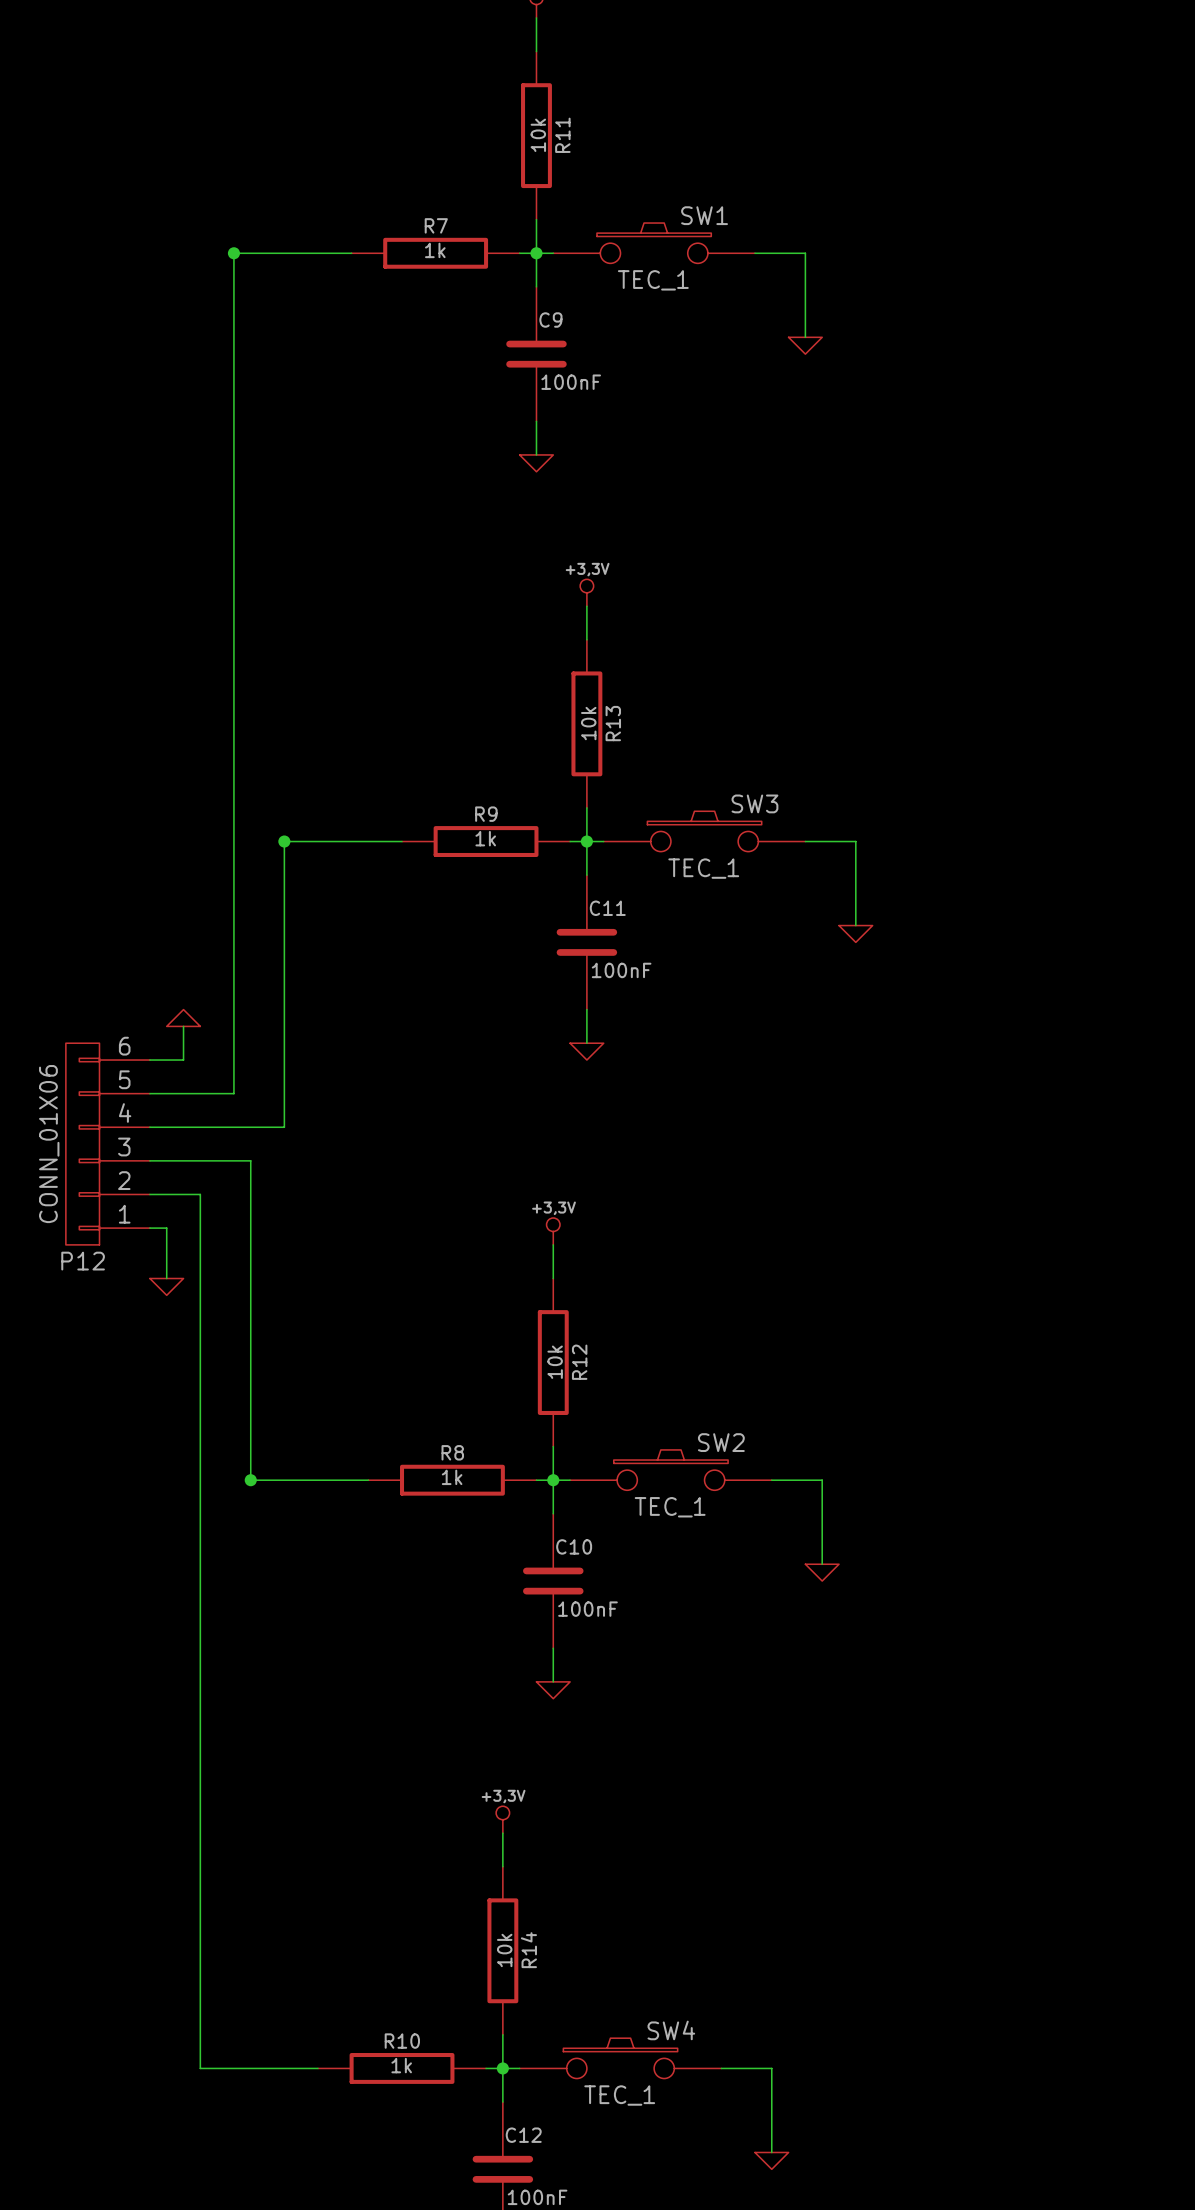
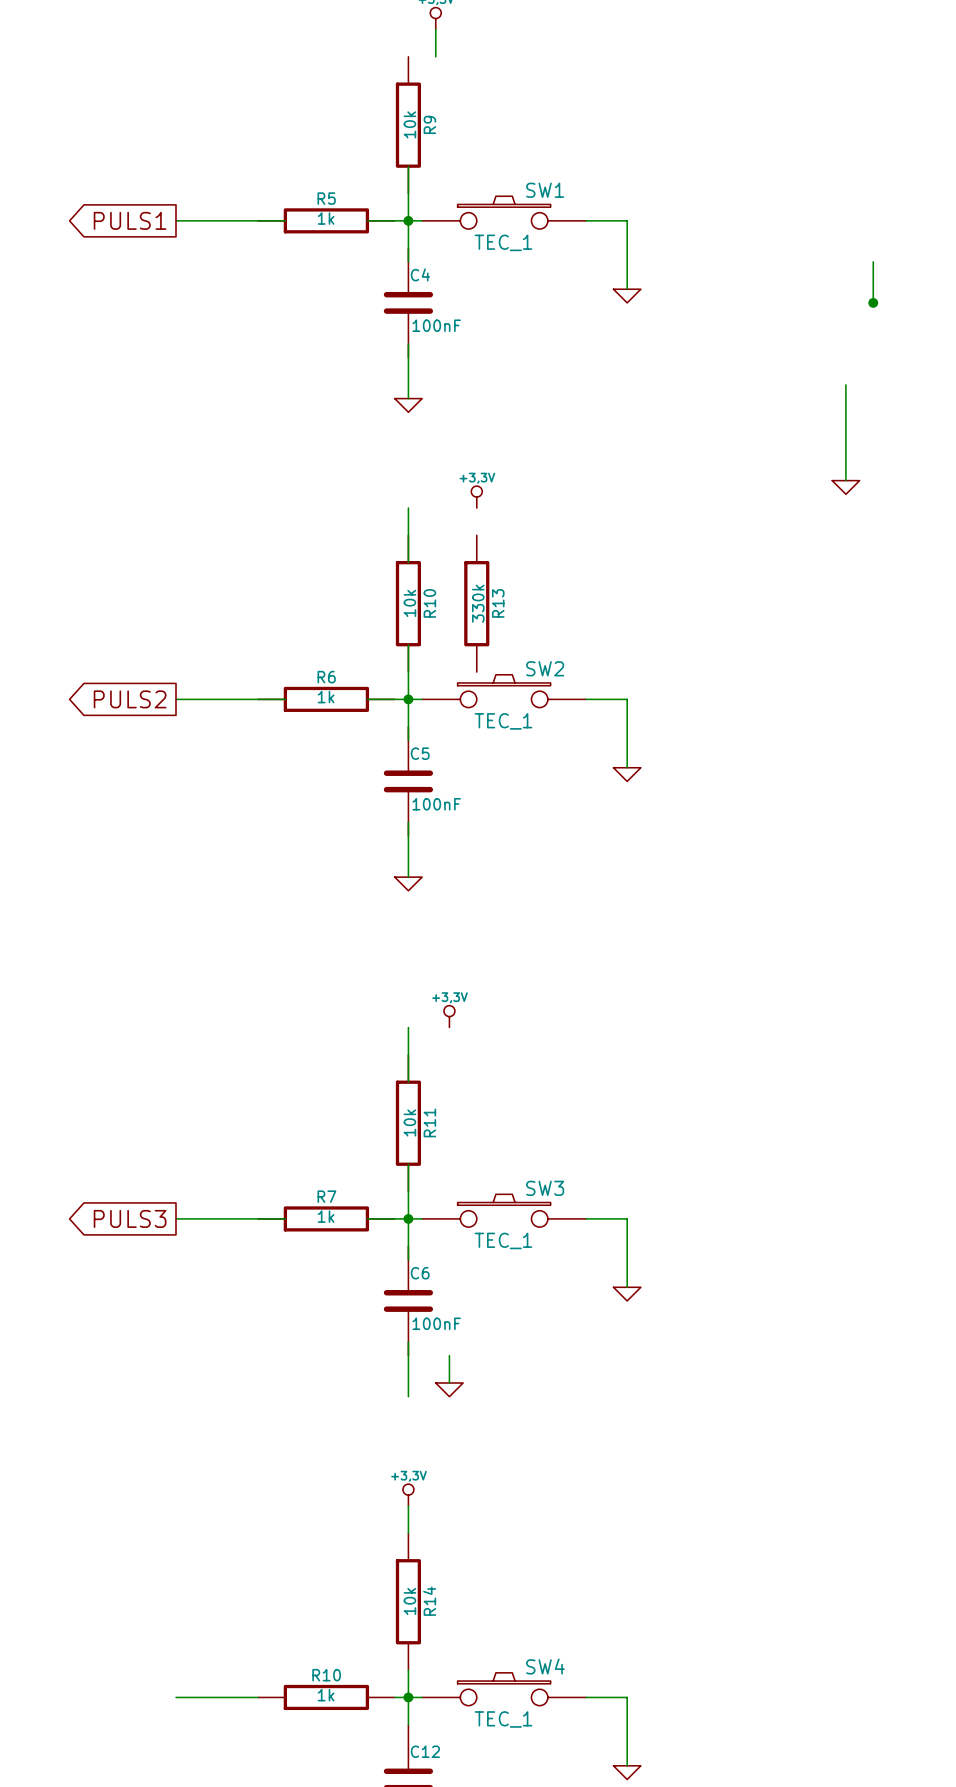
R11 position: (536, 135) -> (408, 1123)
wire: none -> (408, 166) (408, 261)
wire: (536, 219) (536, 286) -> (408, 343) (408, 398)
SW1 position: (654, 243) -> (504, 212)
global label: none -> PULS1 (130, 220)
wire: (233, 253) (233, 1093) (149, 1093) -> (189, 220) (175, 220)
junction: (233, 253) -> none
R5: none -> 1k (326, 220)
R7 position: (435, 253) -> (326, 1218)
junction position: (536, 253) -> (408, 220)
wire: (771, 253) (805, 253) (805, 337) -> (627, 220) (627, 289)
wire: none -> (873, 261) (873, 302)
power symbol position: (805, 345) -> (627, 296)
C4: none -> 100nF (408, 302)
C9: 100nF (536, 354) -> none
junction: none -> (873, 302)
wire: (536, 421) (536, 454) -> none
wire: none -> (845, 384) (845, 480)
power symbol position: (536, 463) -> (408, 405)
power symbol: none -> (845, 487)
wire: none -> (408, 507) (408, 562)
wire: (586, 606) (586, 639) -> none
R10: none -> 10k (408, 603)
R13 value: 10k (588, 723) -> 330k (478, 603)
wire: none -> (408, 644) (408, 740)
wire: (586, 807) (586, 875) -> (408, 822) (408, 877)
SW3 position: (704, 831) -> (504, 1210)
R9 value: 1k (485, 838) -> 10k (409, 124)
global label: none -> PULS2 (130, 699)
wire: (284, 841) (284, 1127) (149, 1127) -> (230, 699) (175, 699)
junction: (284, 841) -> none
wire: (351, 841) (402, 841) -> none
R6: none -> 1k (326, 699)
wire: none -> (367, 699) (422, 699)
R9 rotation: 0° (486, 841) -> 90° clockwise (408, 125)
R9 position: (486, 841) -> (408, 125)
junction: none -> (408, 699)
wire: (570, 841) (603, 841) -> none
junction: (586, 841) -> none
wire: (805, 841) (855, 841) (855, 925) -> (586, 699) (627, 699) (627, 767)
power symbol position: (855, 933) -> (627, 774)
C5: none -> 100nF (408, 781)
C11: 100nF (586, 942) -> none
wire: (586, 1009) (586, 1043) -> none
power symbol: (183, 1018) -> none
wire: (183, 1026) (183, 1060) (149, 1060) -> none
power symbol position: (586, 1051) -> (408, 883)
P12: CONN_01X06 (107, 1144) -> none
wire: (149, 1160) (250, 1160) (250, 1480) -> (175, 1218) (203, 1218)
wire: (149, 1194) (200, 1194) (200, 2068) (217, 2068) -> none
wire: (149, 1228) (166, 1228) (166, 1278) -> none
wire: none -> (408, 1027) (408, 1082)
wire: (553, 1244) (553, 1278) -> none
power symbol: (166, 1286) -> none
R12: 10k (553, 1362) -> none
wire: none -> (408, 1164) (408, 1259)
wire: (553, 1446) (553, 1513) -> (408, 1341) (408, 1396)
SW2 position: (670, 1470) -> (504, 691)
global label: none -> PULS3 (130, 1218)
junction: (250, 1480) -> none
wire: (351, 1480) (368, 1480) -> none
wire: none -> (367, 1218) (422, 1218)
R8: 1k (452, 1480) -> none
junction position: (553, 1480) -> (408, 1218)
wire: (771, 1480) (822, 1480) (822, 1564) -> (586, 1218) (627, 1218) (627, 1287)
power symbol position: (822, 1572) -> (627, 1294)
C6: none -> 100nF (408, 1300)
C10: 100nF (553, 1581) -> none

